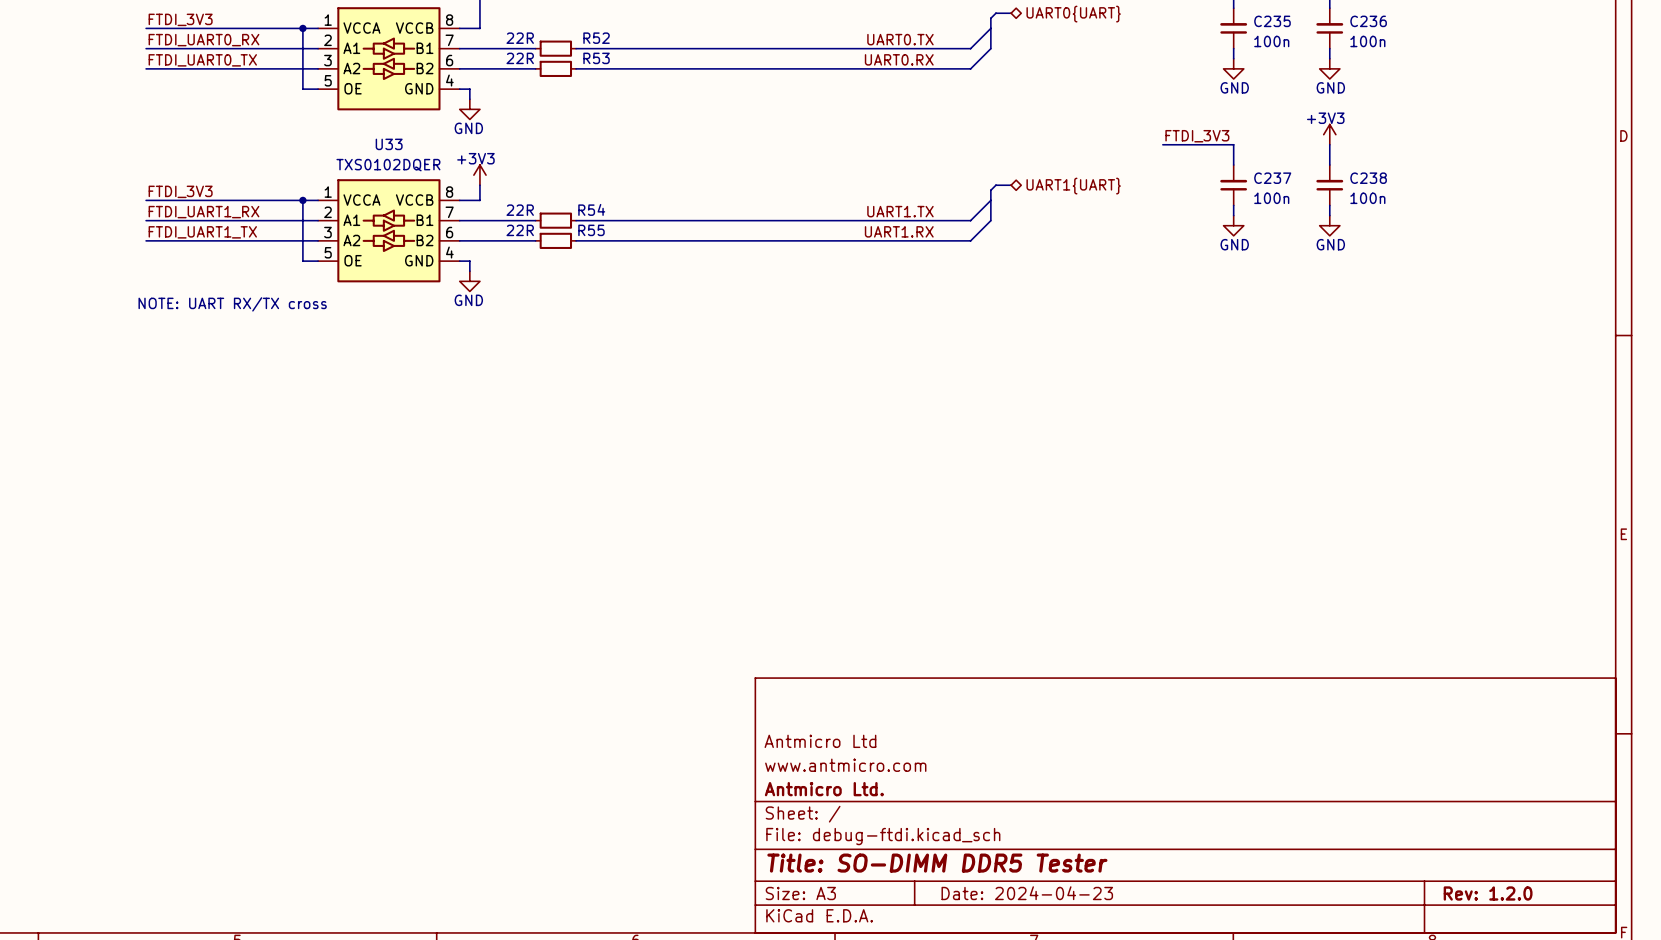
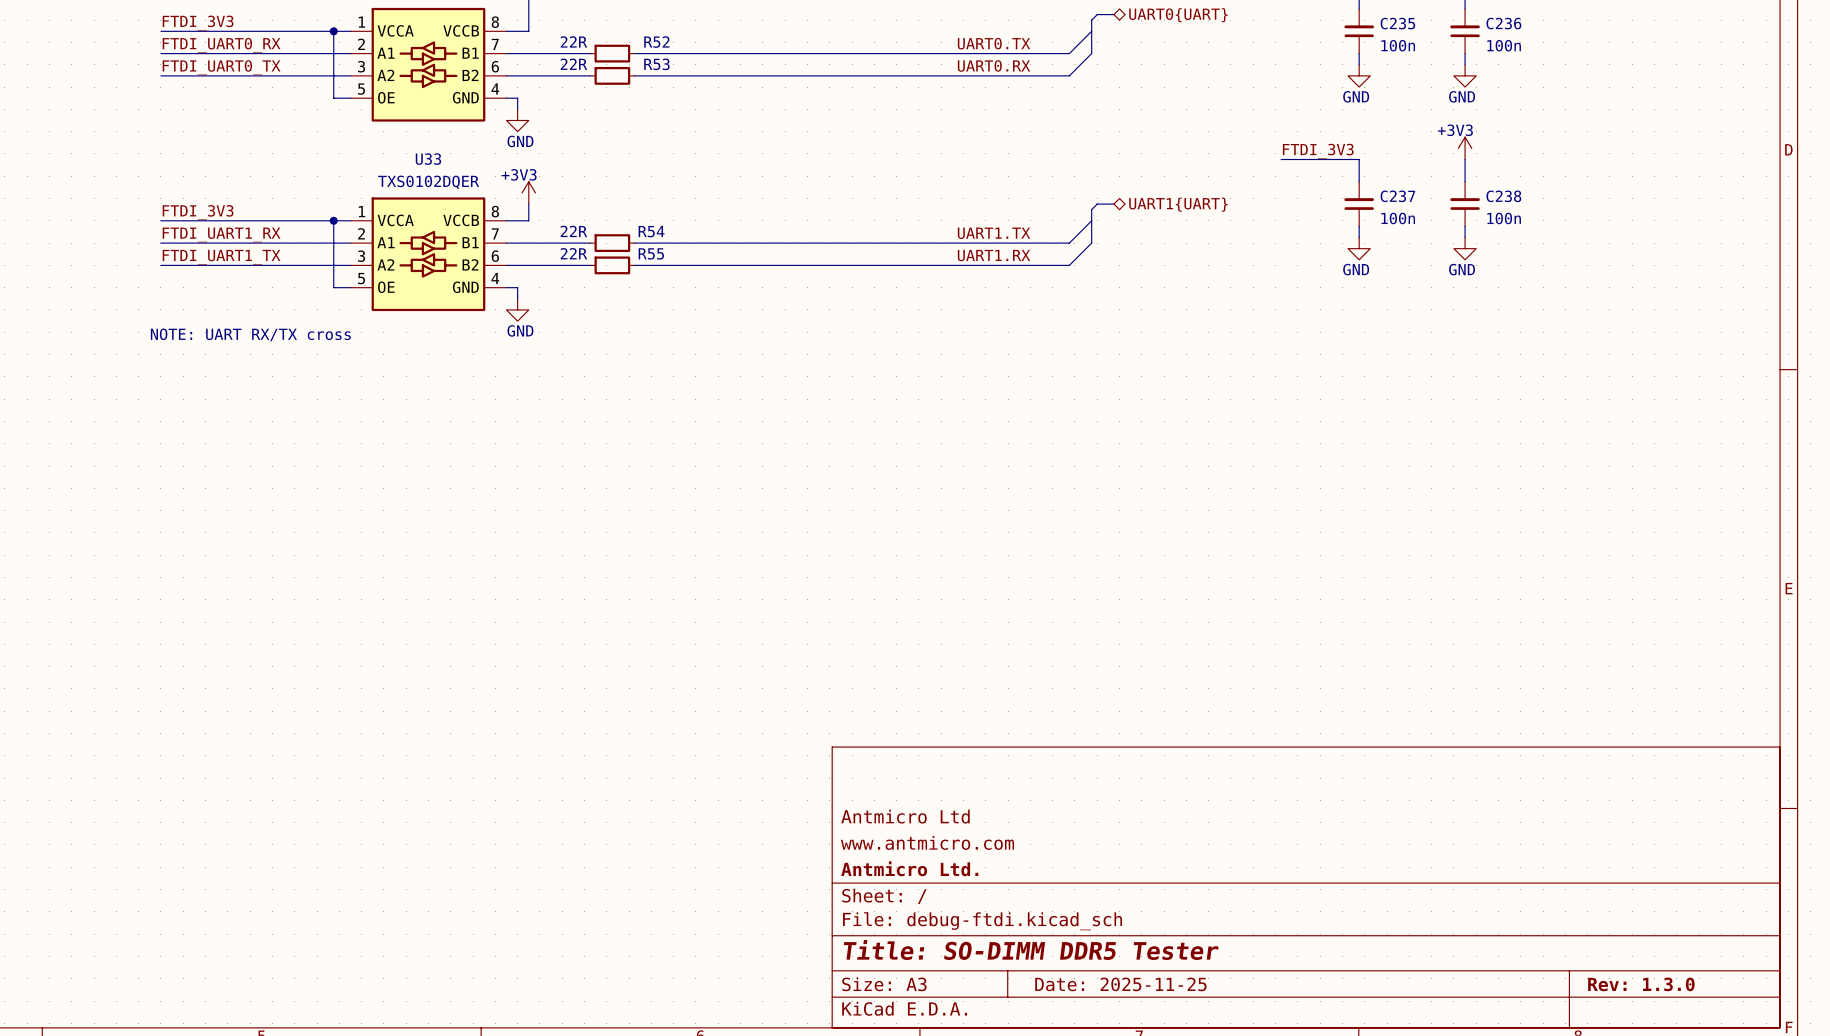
title block: Date: 2024-04-23 (1027, 893) -> Date: 2025-11-25 (1120, 984)
title block: Rev: 1.2.0 (1488, 893) -> Rev: 1.3.0 (1641, 984)

